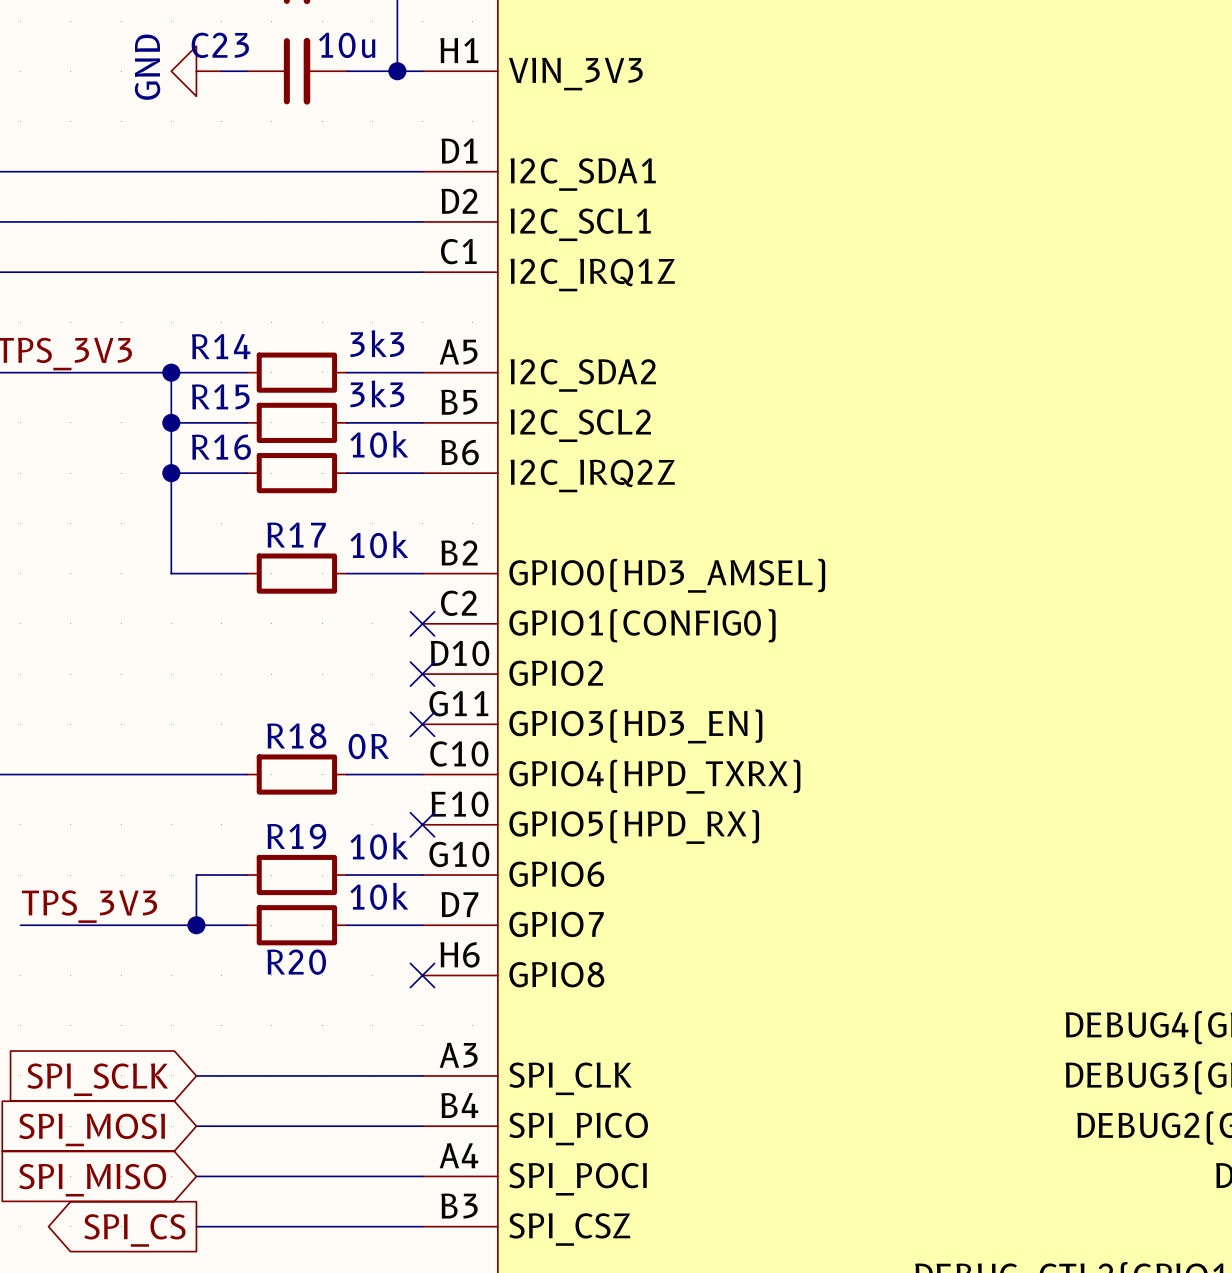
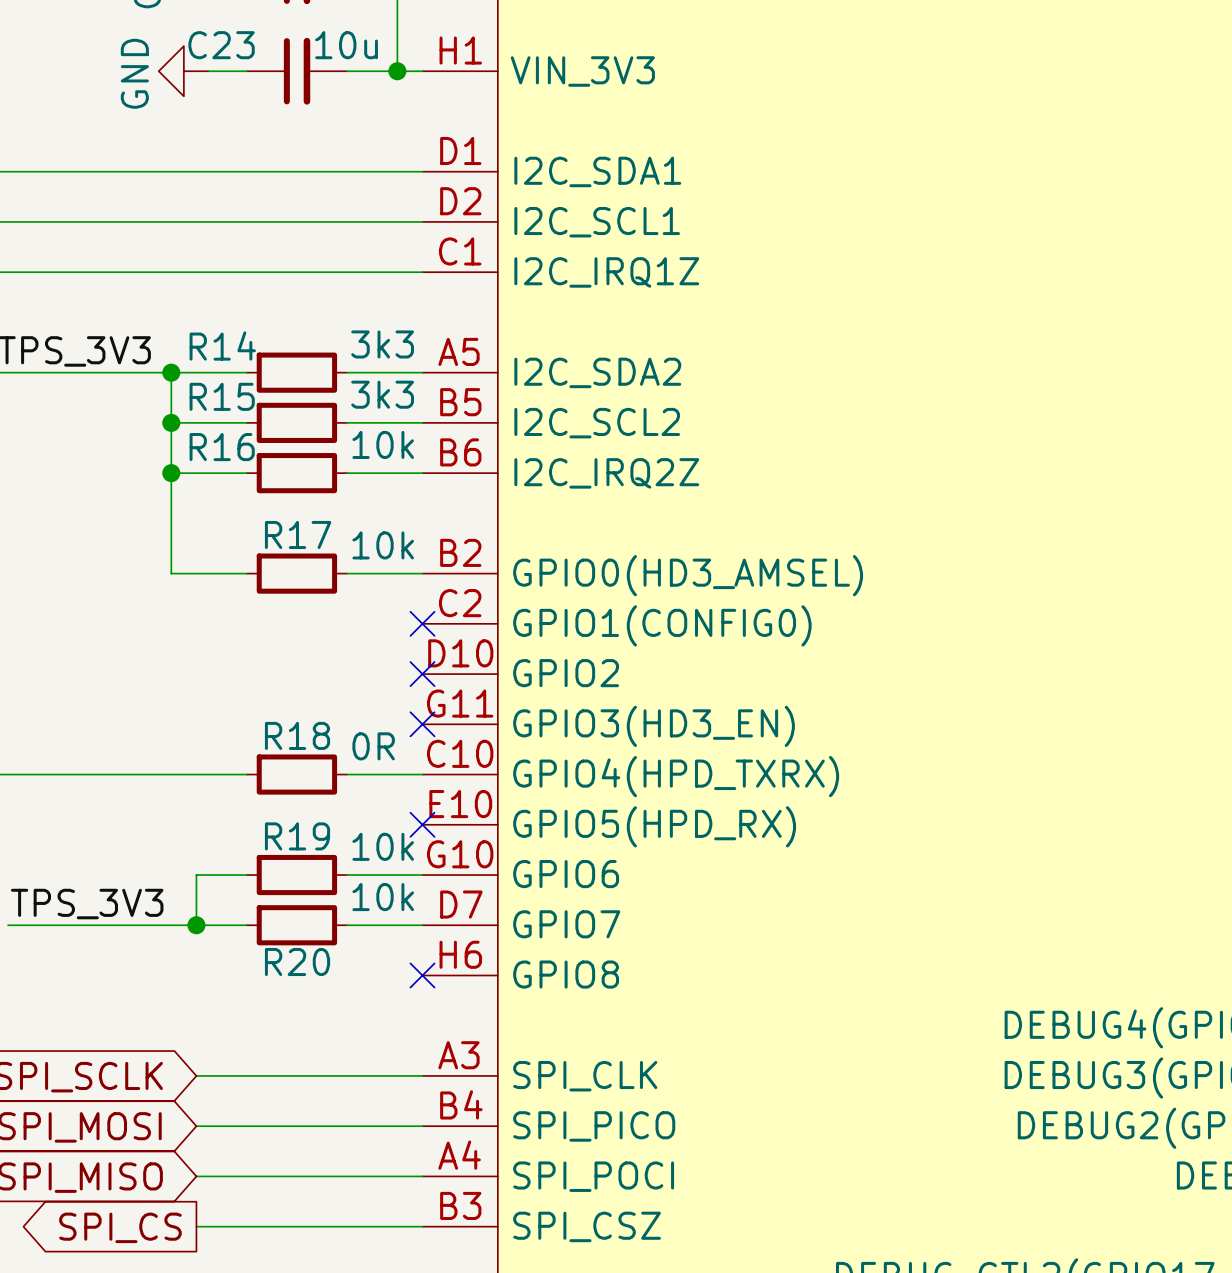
power symbol position: GND (196, 71) -> GND (183, 71)
label position: TPS_3V3 (89, 906) -> TPS_3V3 (87, 904)
wire: none -> (8, 925) (20, 925)

